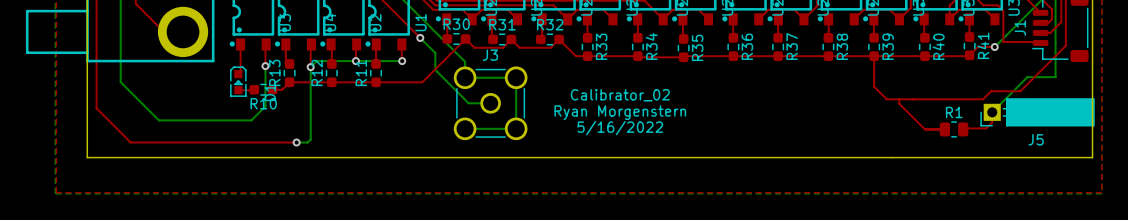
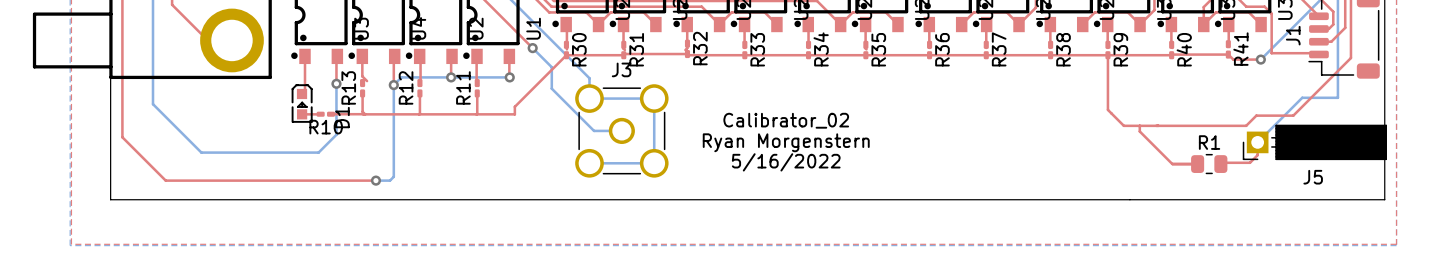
R33 footprint: [581, 32, 594, 62] -> [742, 40, 748, 60]
R34 footprint: [632, 32, 644, 62] -> [805, 40, 812, 60]
R36 footprint: [727, 32, 740, 62] -> [927, 40, 933, 60]
R37 footprint: [772, 32, 784, 62] -> [983, 40, 989, 60]
R38 footprint: [822, 32, 835, 62] -> [1048, 40, 1054, 60]
R39 footprint: [868, 32, 880, 62] -> [1105, 40, 1111, 60]
R40 footprint: [919, 32, 931, 62] -> [1169, 40, 1175, 60]
R41 footprint: [963, 32, 976, 61] -> [1225, 40, 1231, 59]
R30 footprint: [442, 33, 471, 45] -> [563, 40, 569, 60]
R31 footprint: [488, 33, 517, 46] -> [621, 40, 627, 60]
R32 footprint: [535, 33, 565, 46] -> [684, 39, 691, 59]
R35 footprint: [677, 34, 690, 63] -> [863, 40, 869, 60]
top track: none -> (1107, 55) (1107, 71)
top track: none -> (1228, 54) (566, 55) (514, 106) (514, 114) (363, 114)
top track: (977, 47) (968, 56) (639, 57) (575, 56) (559, 39) (550, 47) (519, 47) (511, 39) (503, 47) (474, 47) (465, 38) (422, 82) (289, 82) (282, 89) (272, 89) -> (1239, 59) (1233, 59) (1228, 54)
R13 footprint: [283, 59, 296, 88] -> [360, 79, 366, 98]
R12 footprint: [325, 59, 338, 88] -> [417, 79, 423, 98]
R11 footprint: [370, 59, 382, 88] -> [474, 79, 480, 98]
top track: none -> (362, 93) (362, 111) (365, 114)
top track: none -> (419, 93) (419, 114)
top track: none -> (477, 93) (476, 114)
R10 footprint: [249, 83, 278, 96] -> [316, 111, 336, 117]
top track: none -> (331, 113) (365, 114)

